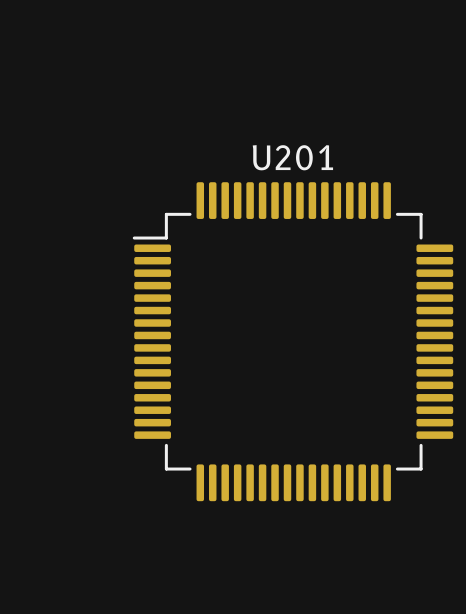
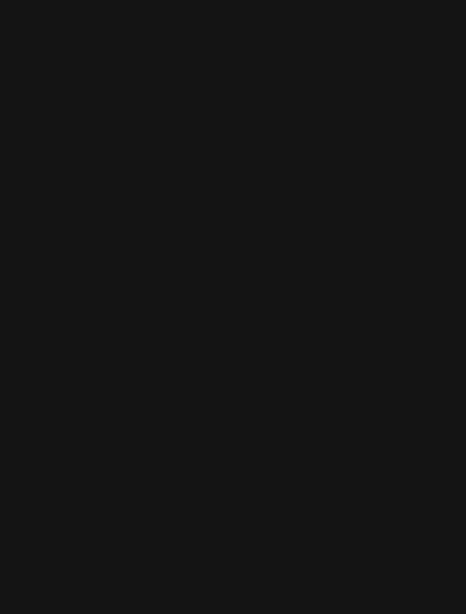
U201: (292, 341) -> none

